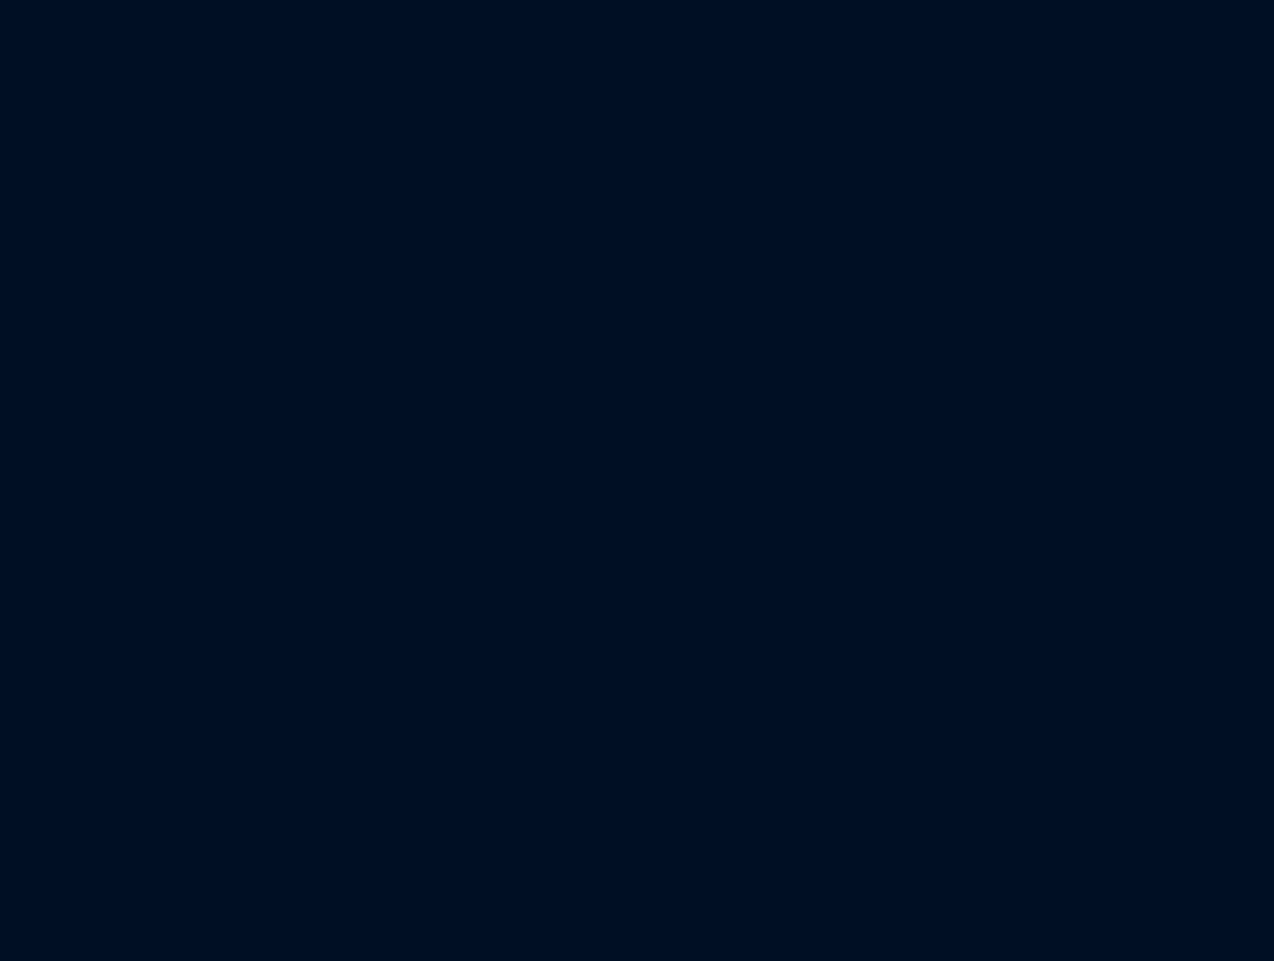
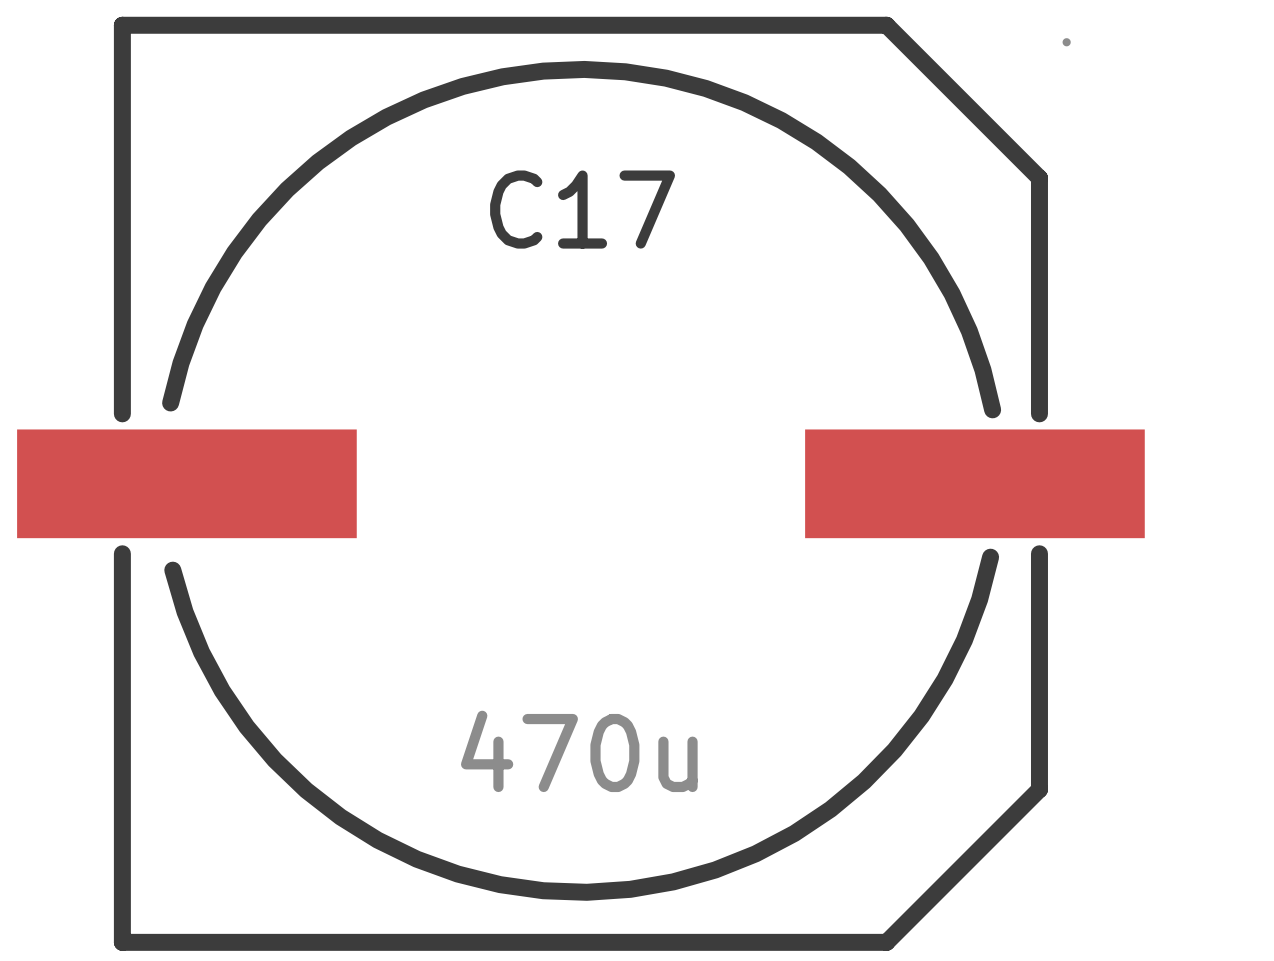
C17: none -> 470u (580, 483)

